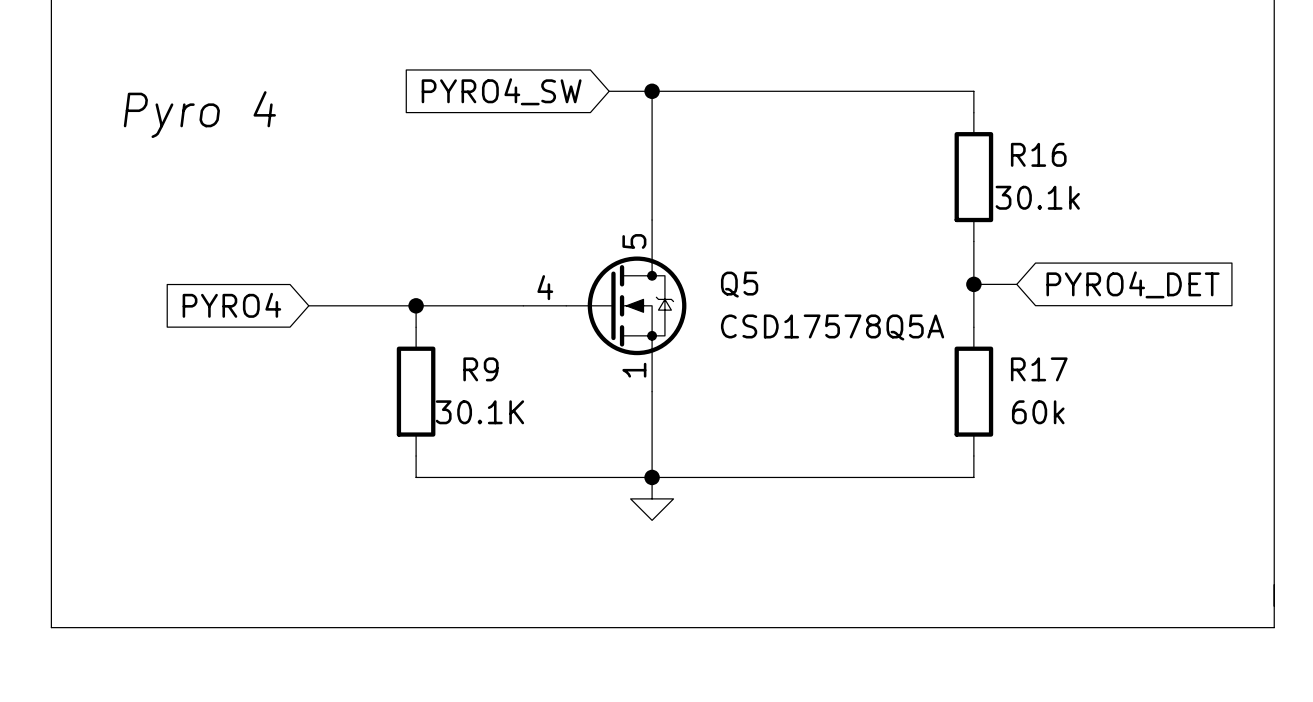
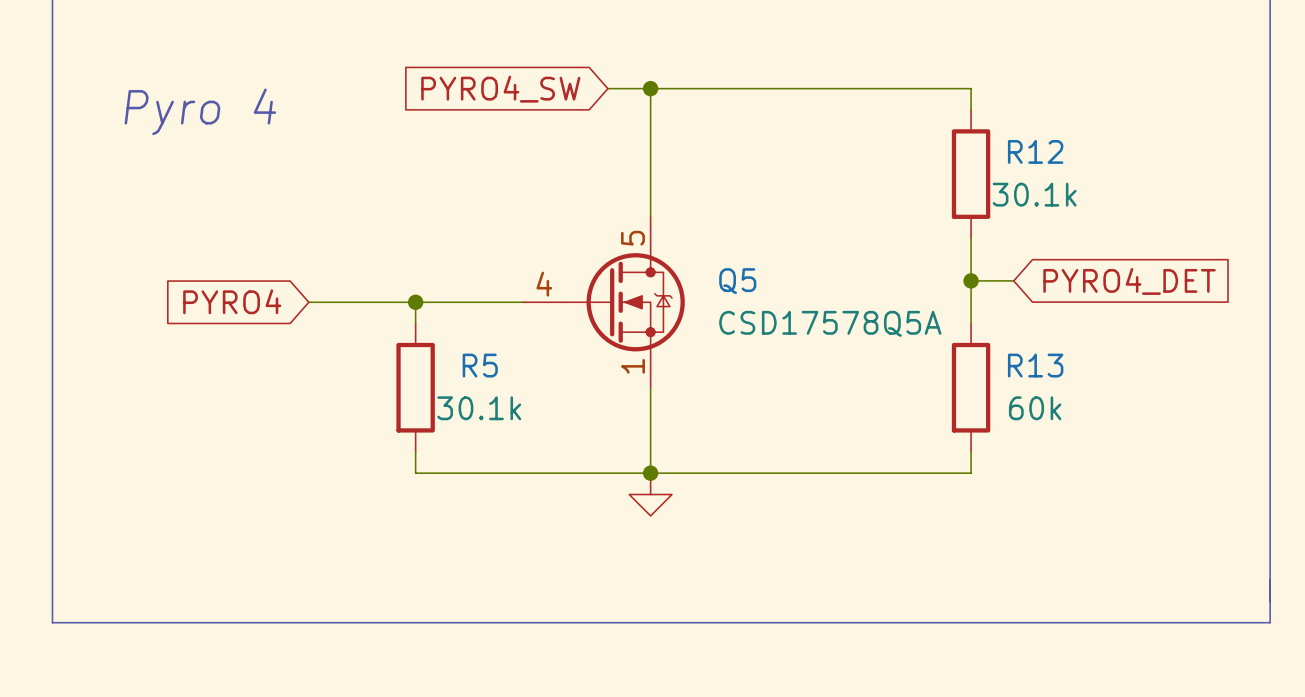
R16 name: R16 (1038, 154) -> R12 (1035, 151)
R9 name: R9 (480, 369) -> R5 (480, 365)
R17 name: R17 (1039, 369) -> R13 (1035, 365)
R9 value: 30.1K (479, 412) -> 30.1k (479, 408)

